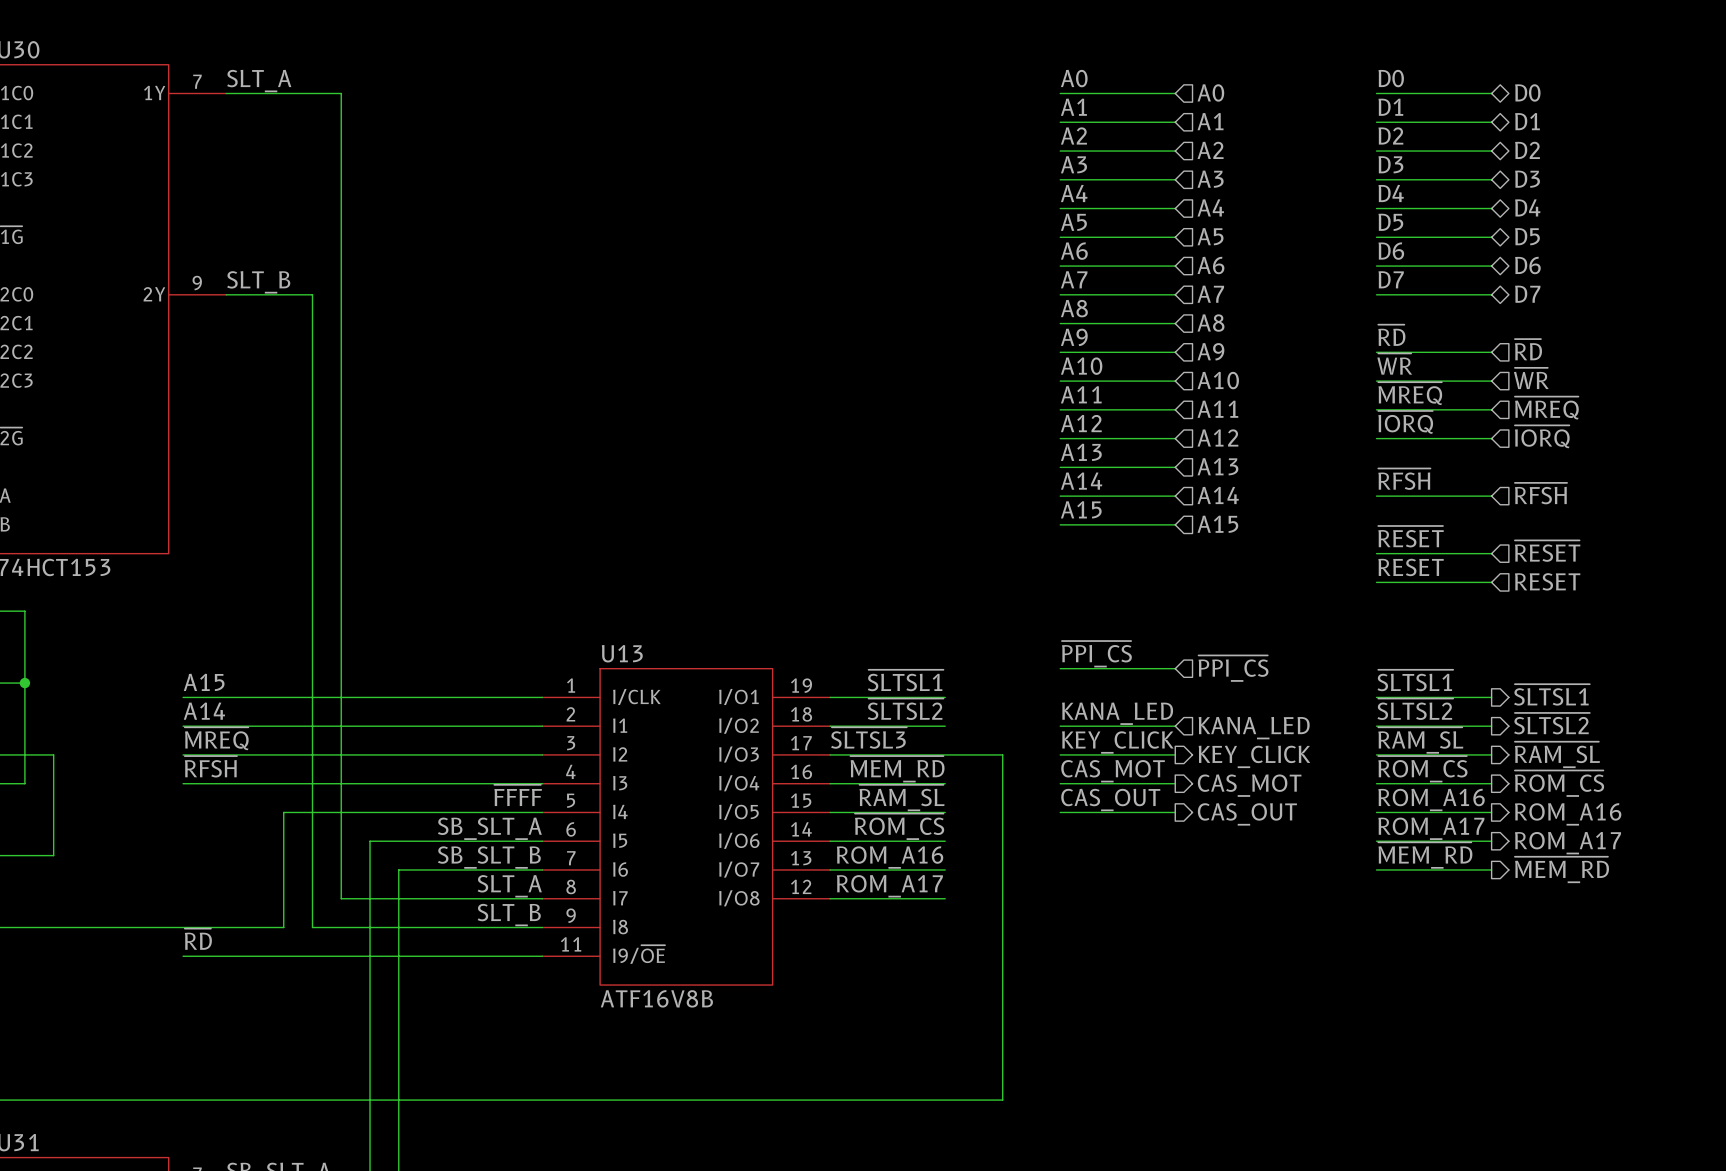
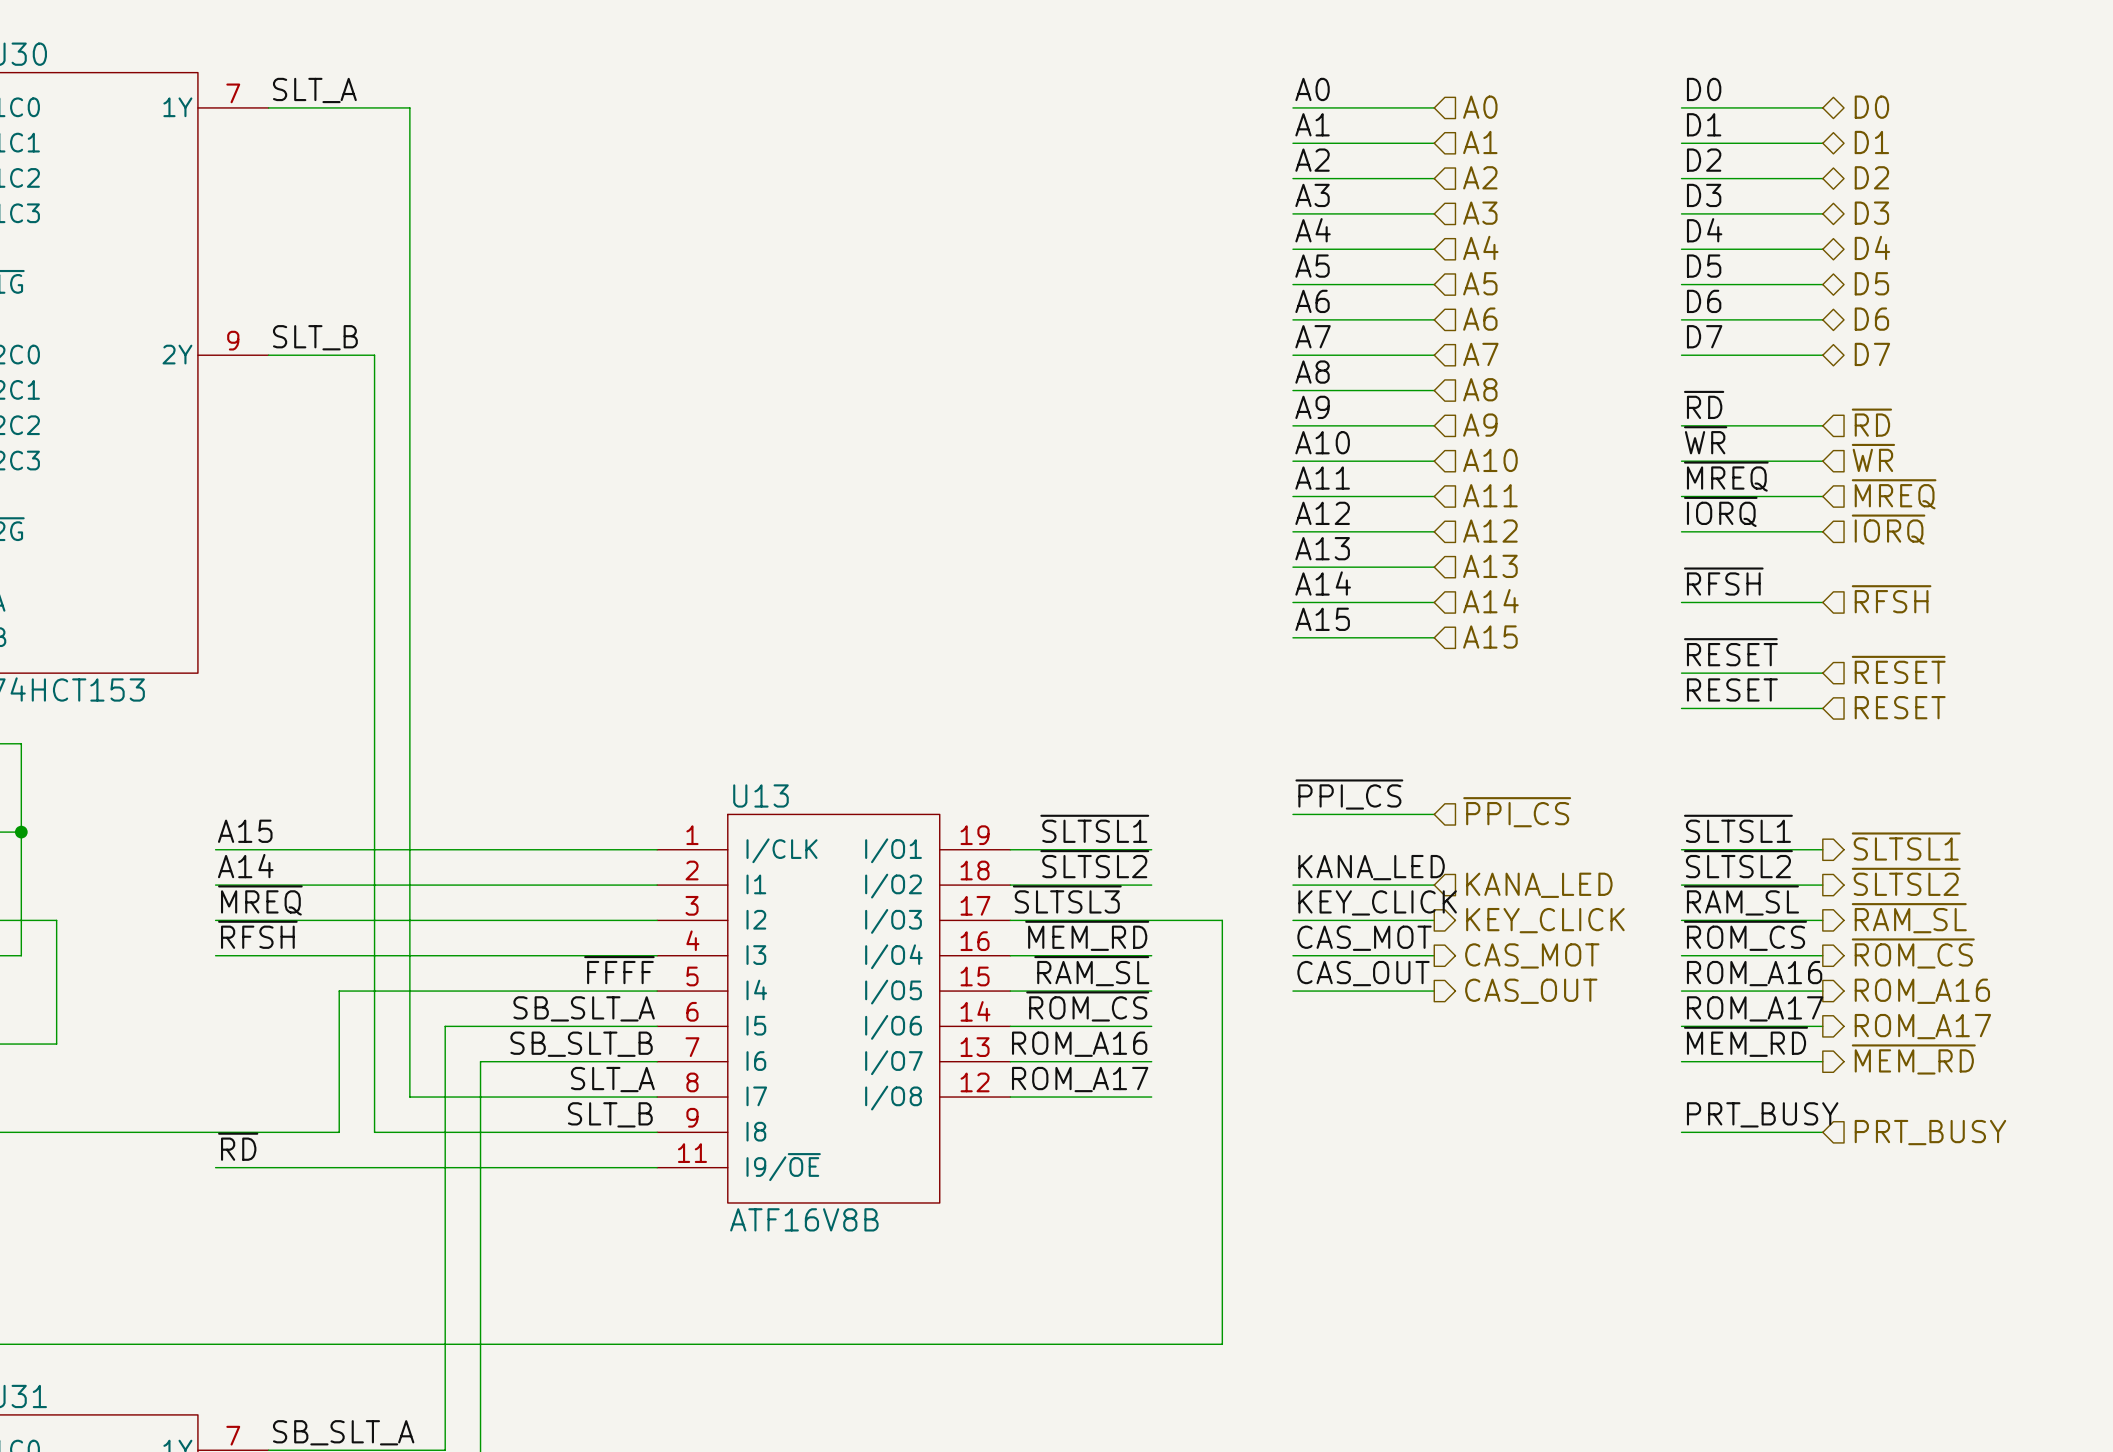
label: none -> PRT_BUSY (1762, 1114)
wire: none -> (1681, 1132) (1822, 1132)
hierarchical label: none -> PRT_BUSY (1930, 1132)

